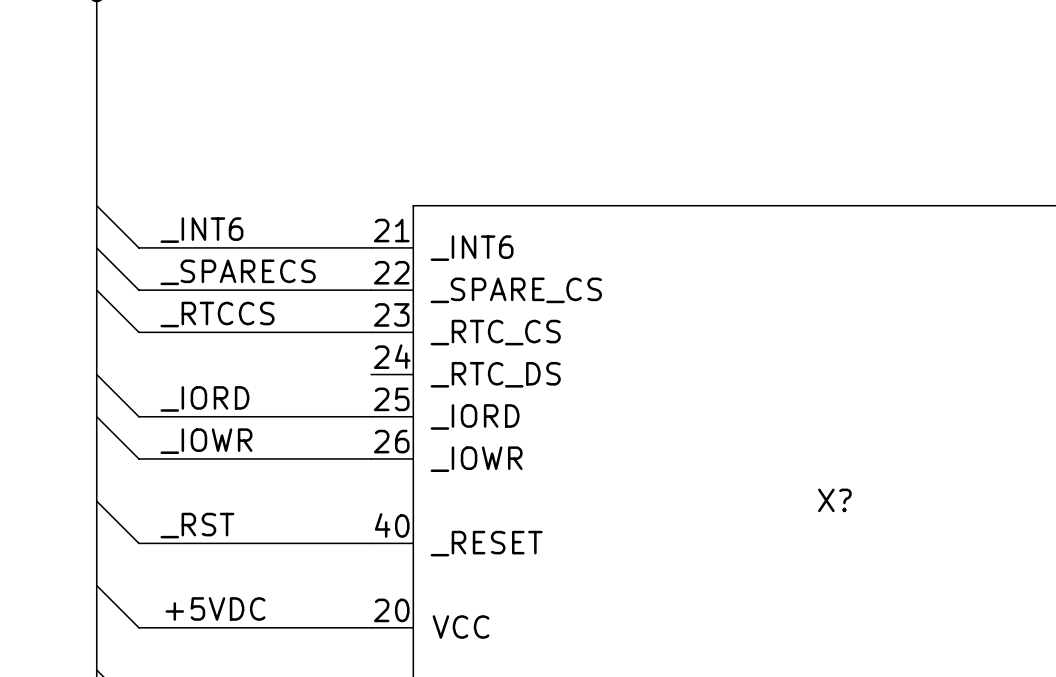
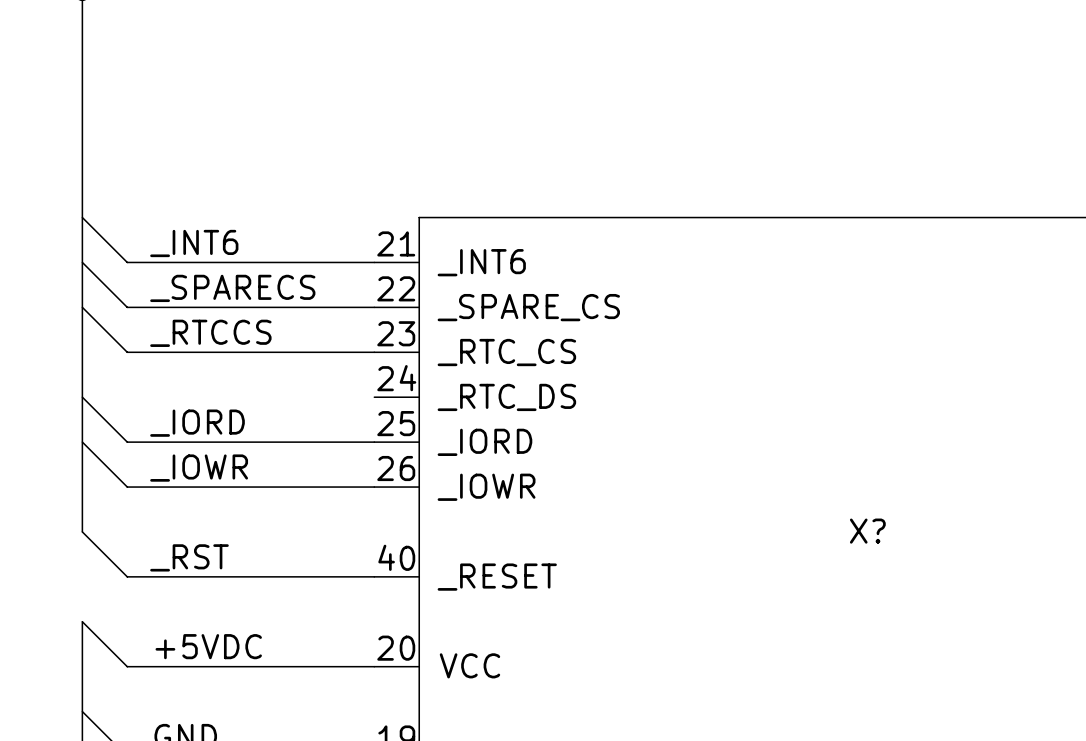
bus: (96, 501) (96, 585) -> none

